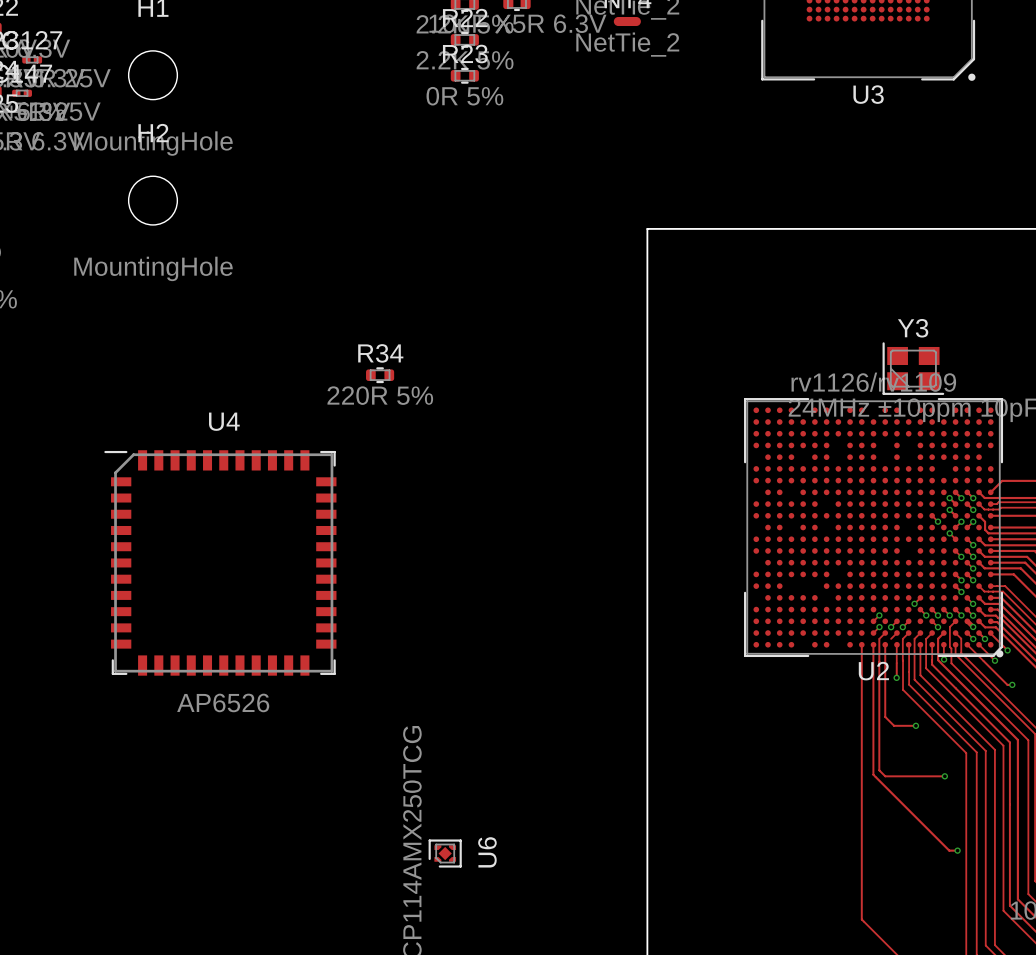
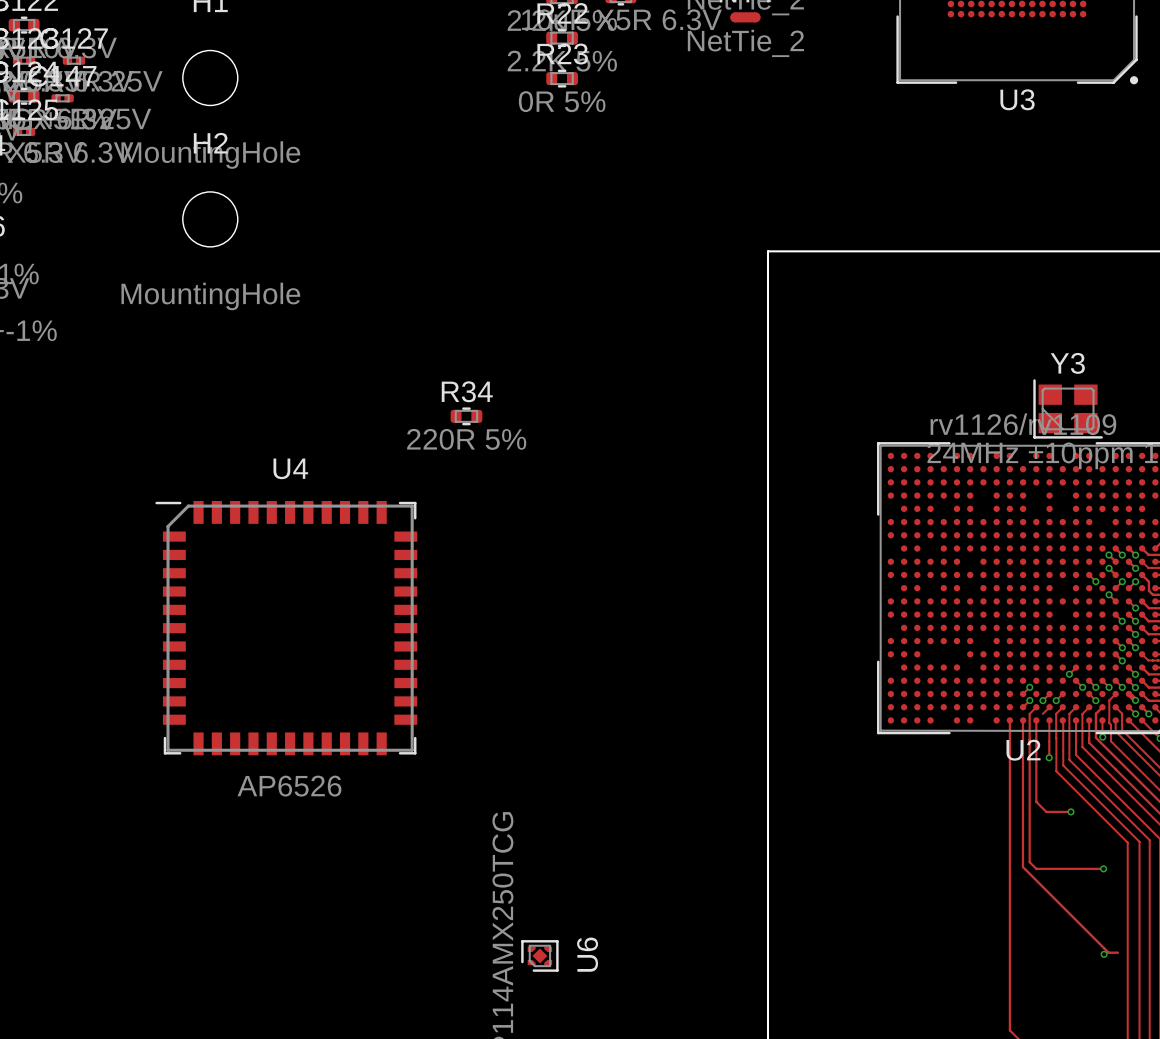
via position: (957, 850) -> (1104, 954)

